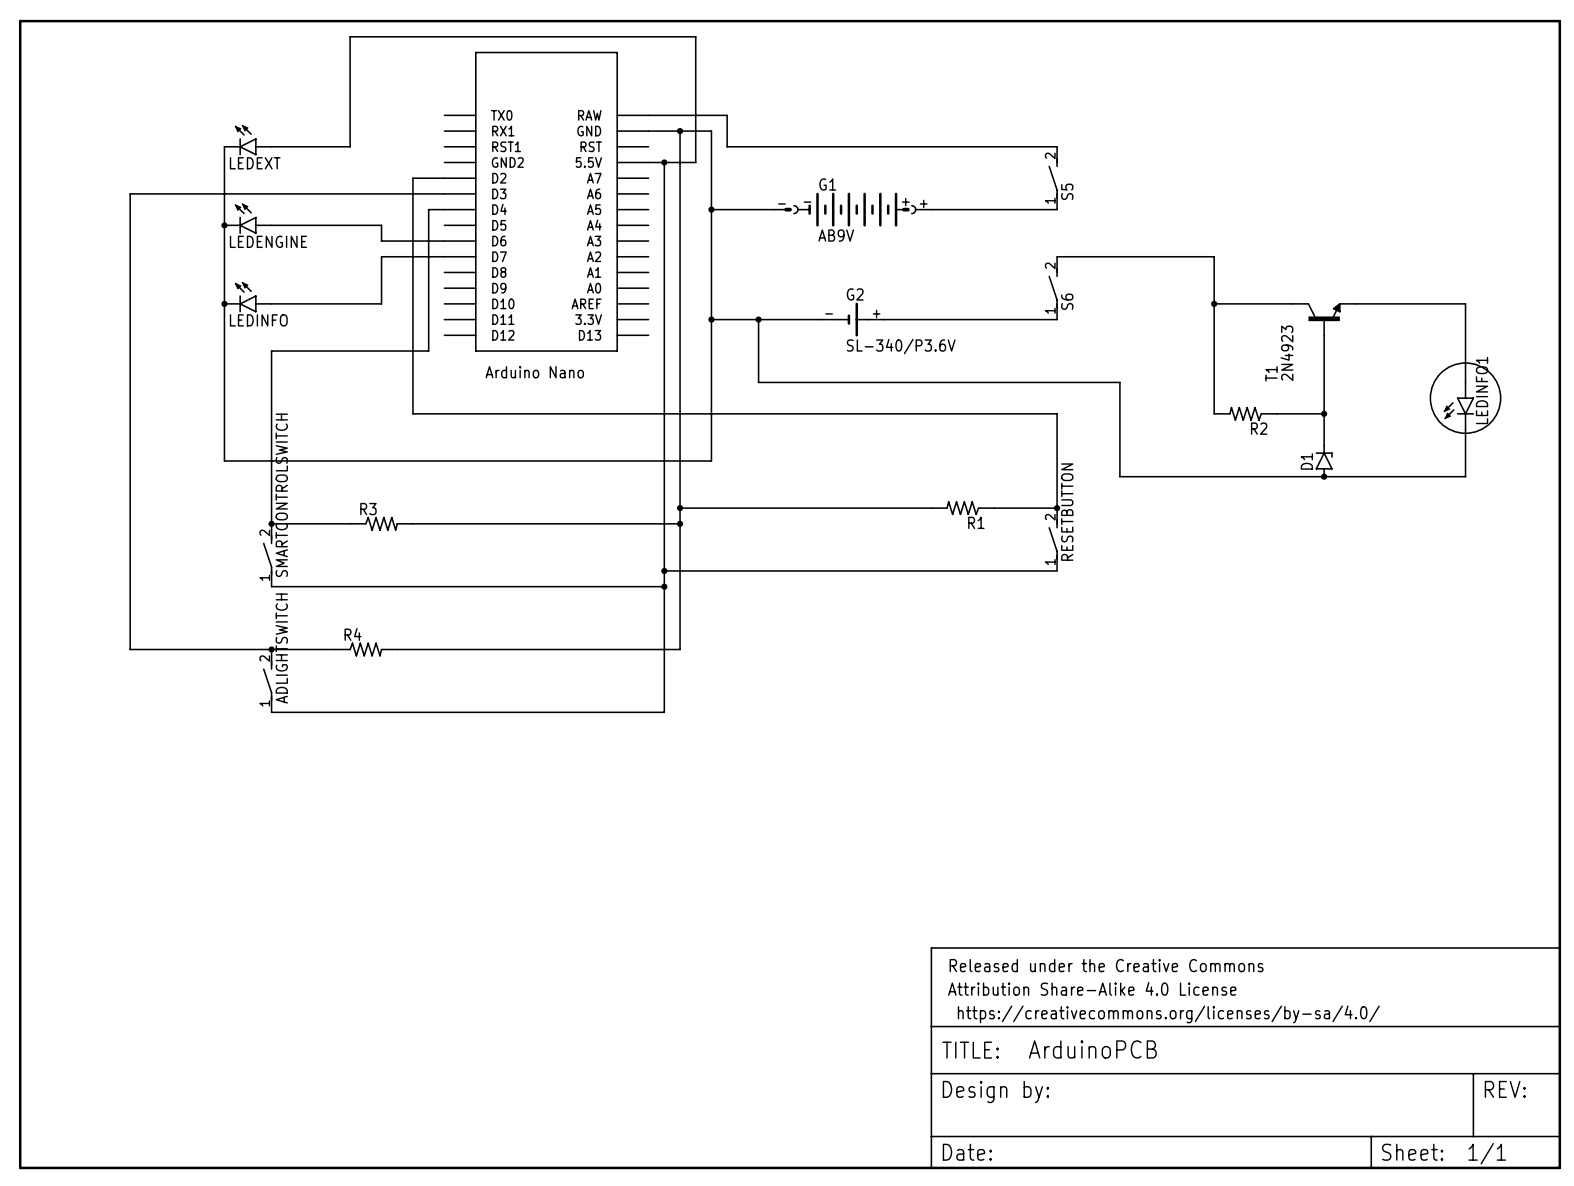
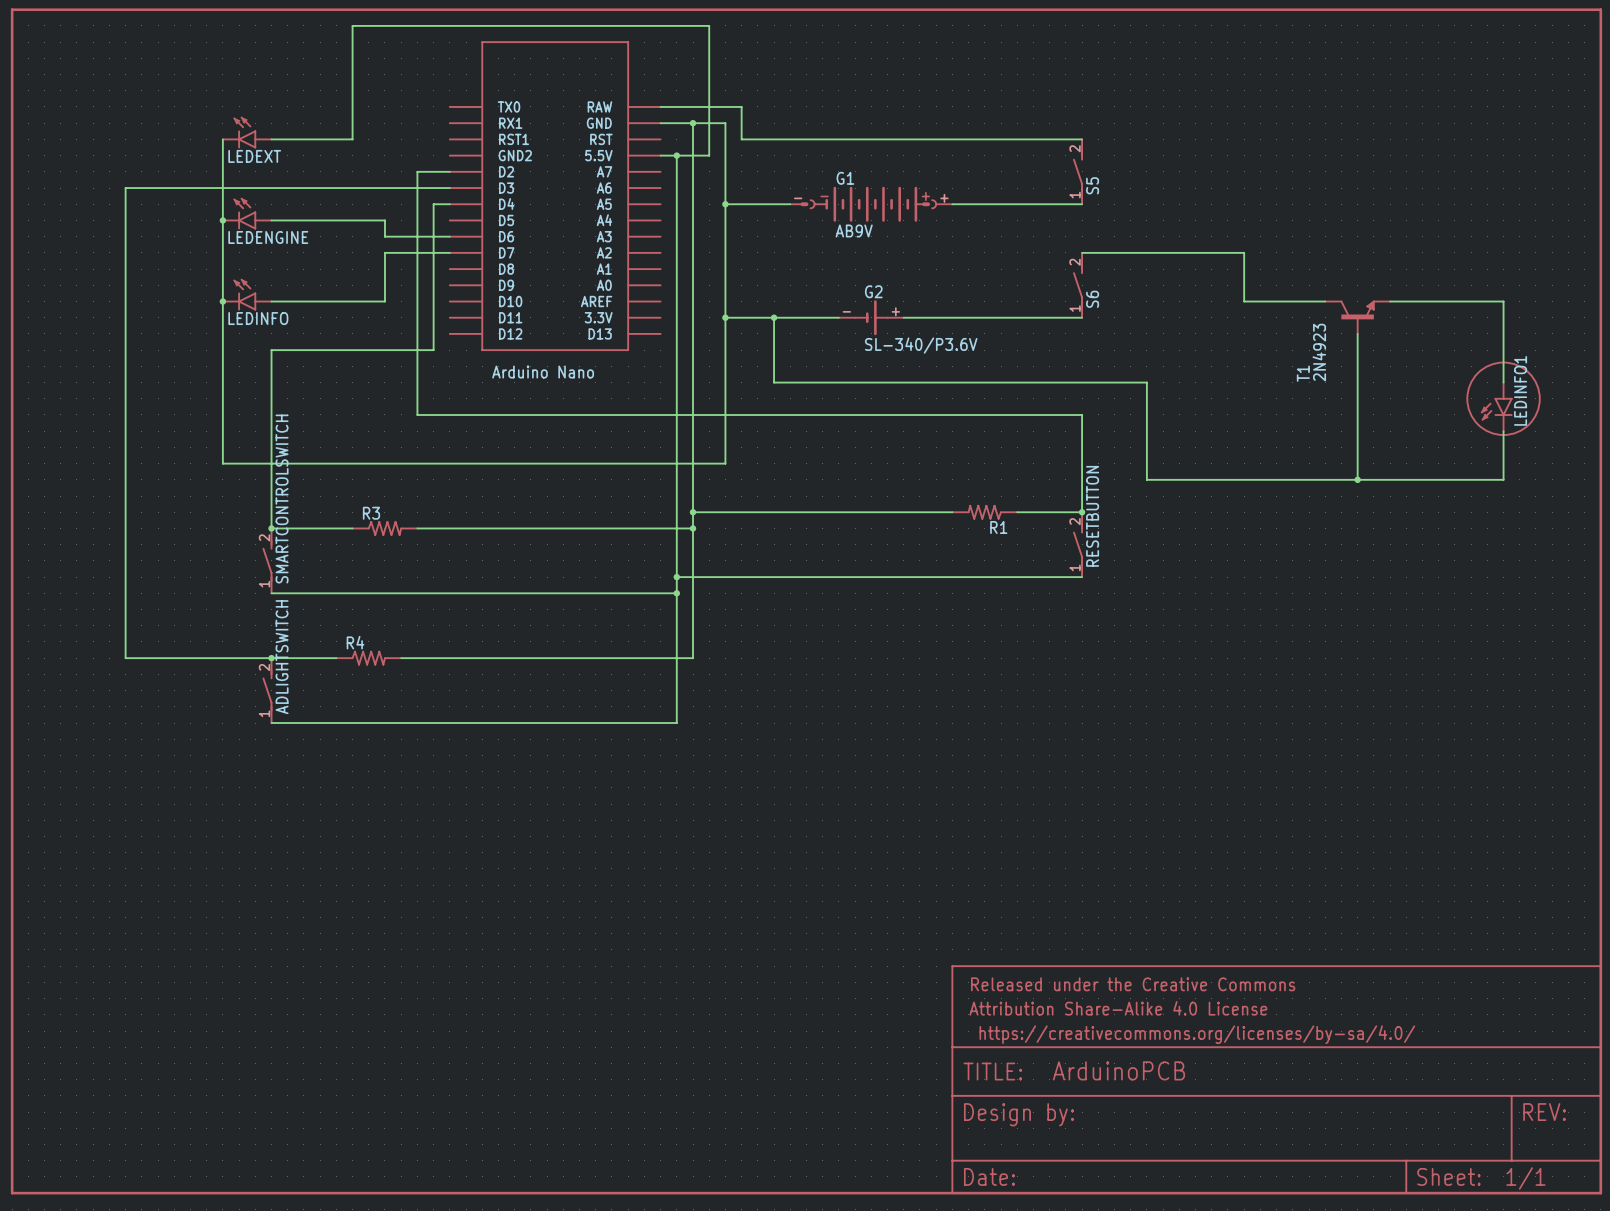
wire: (1214, 303) (1214, 413) -> none
junction: (1214, 303) -> none
R2: (1245, 413) -> none
wire: (1277, 413) (1324, 413) -> none
junction: (1324, 413) -> none
D1: (1324, 460) -> none

